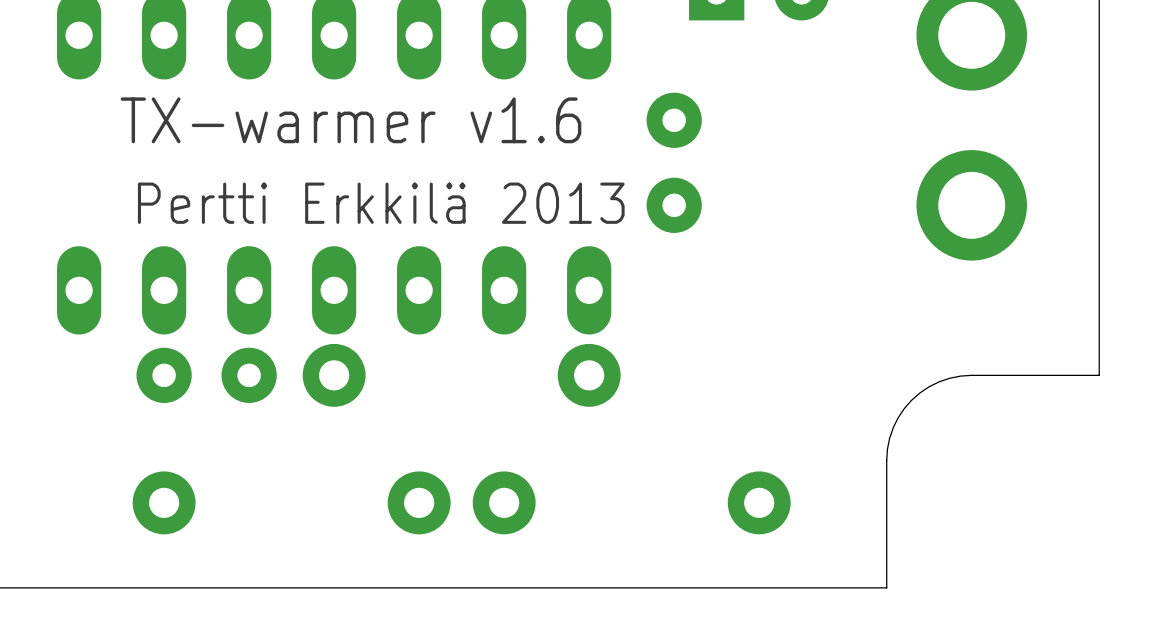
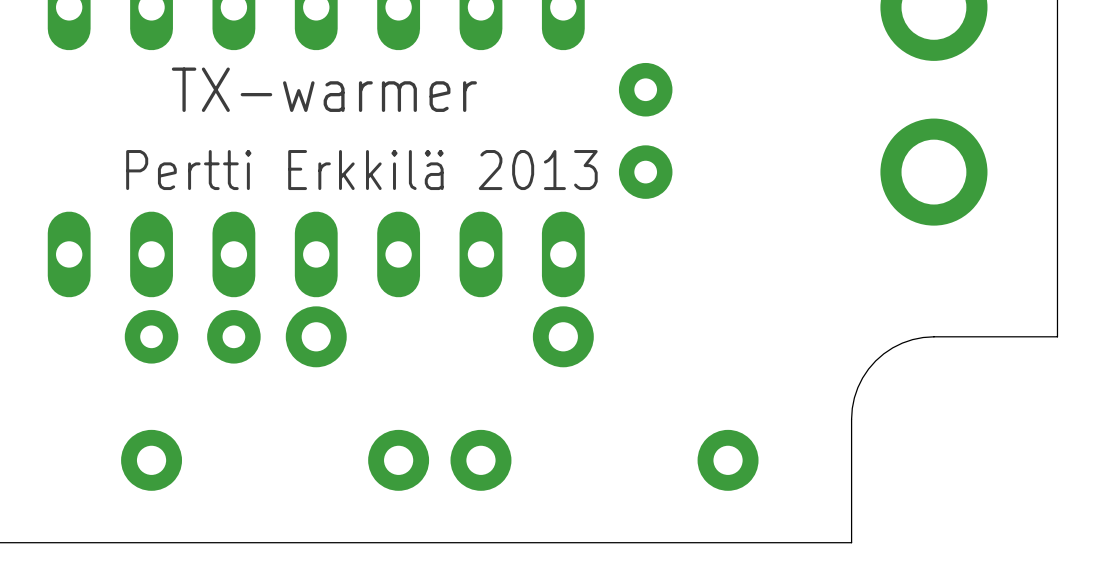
text: TX-warmer v1.6 (351, 120) -> TX-warmer (324, 89)

